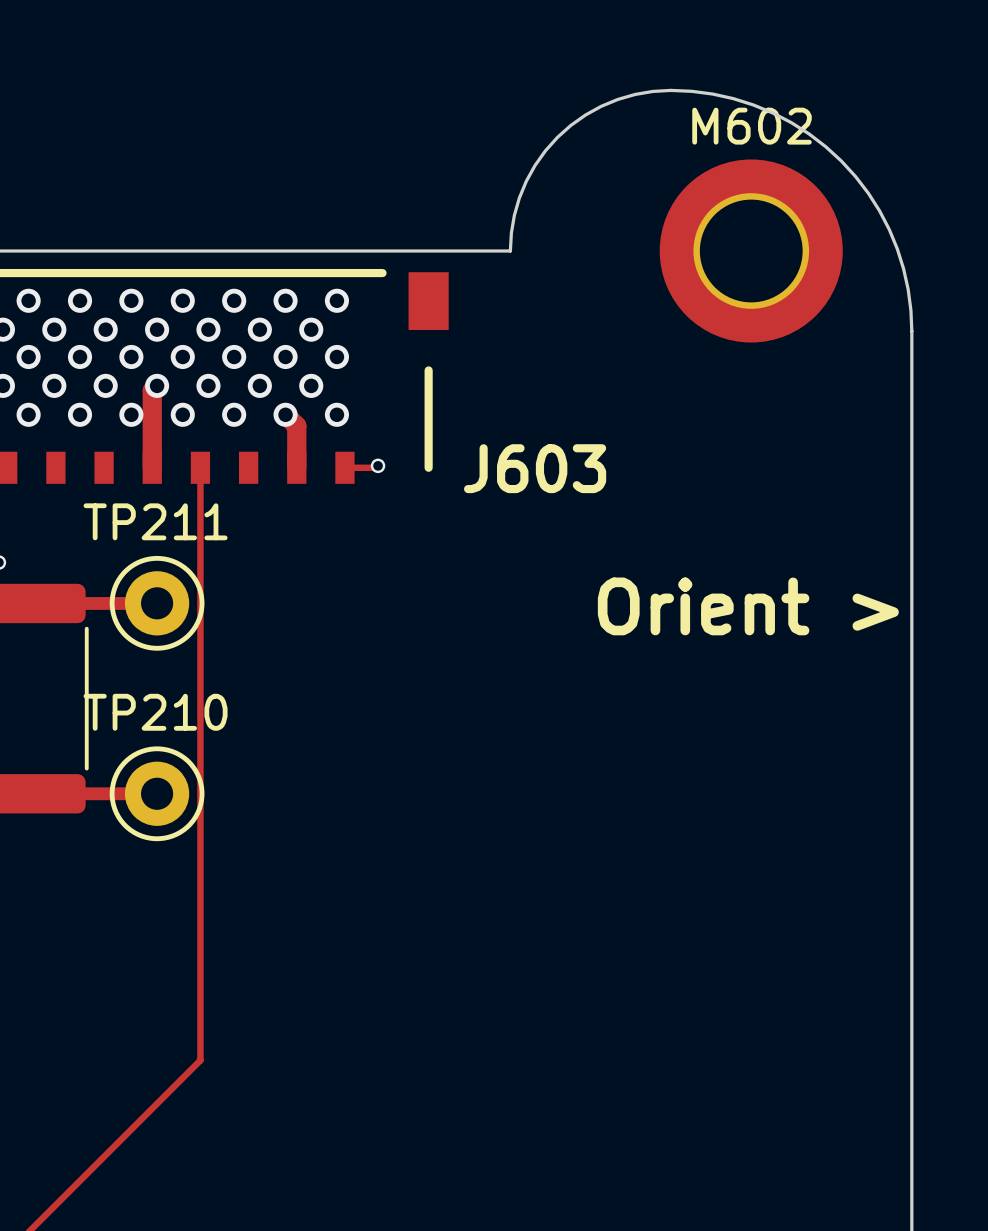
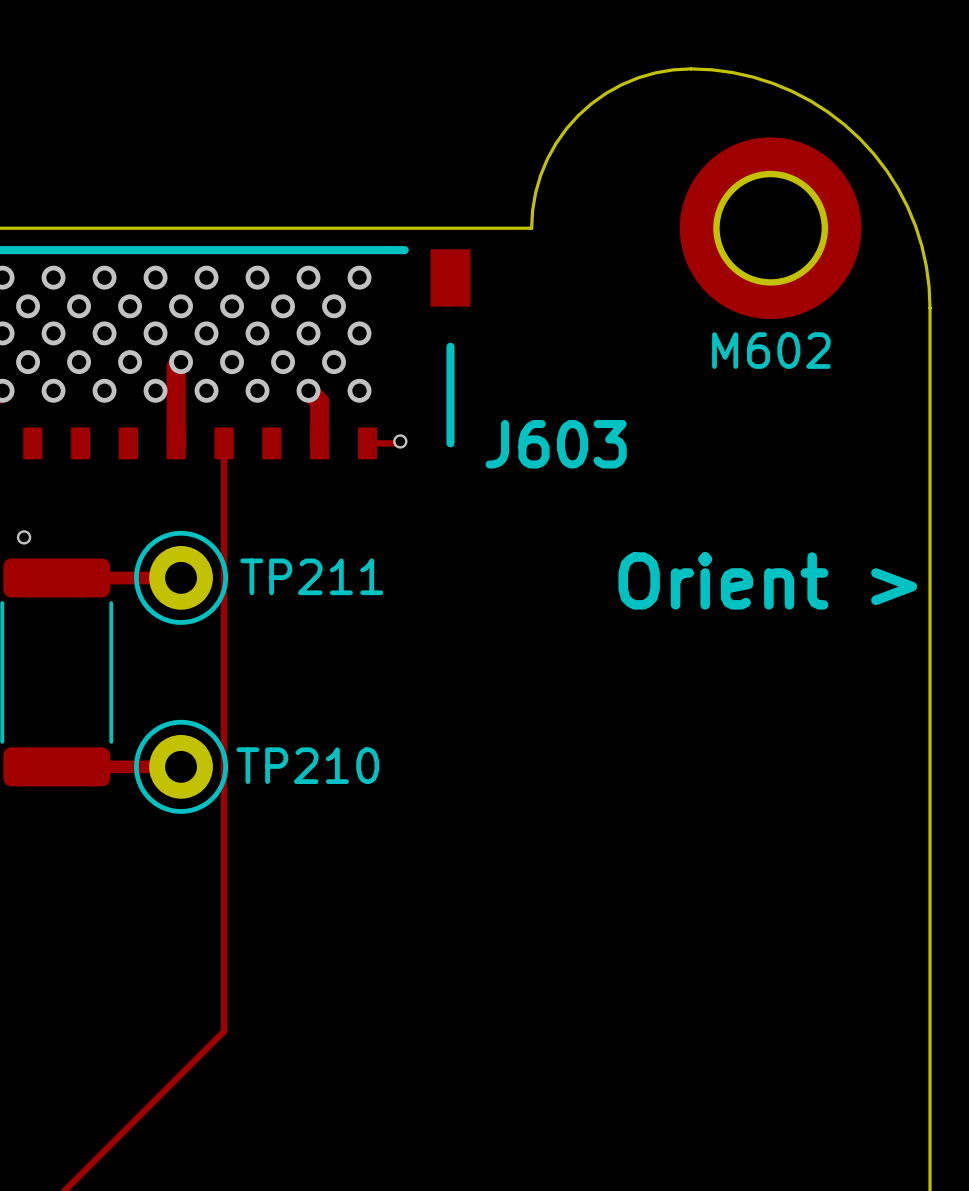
M602 name position: M602 (752, 126) -> M602 (771, 350)
TP211 name position: TP211 (155, 521) -> TP211 (311, 576)
TP210 name position: TP210 (155, 712) -> TP210 (307, 765)

